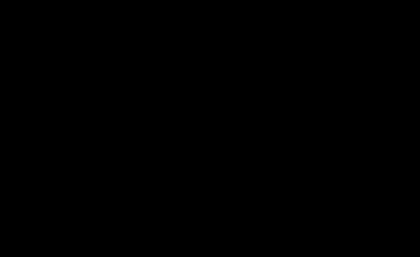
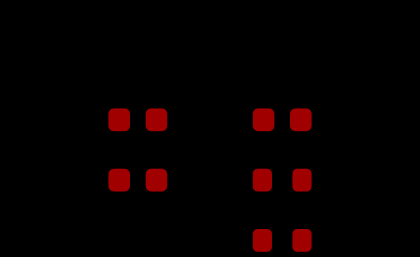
part: none -> (137, 119)
part: none -> (282, 119)
part: none -> (137, 180)
part: none -> (282, 180)
part: none -> (282, 240)

